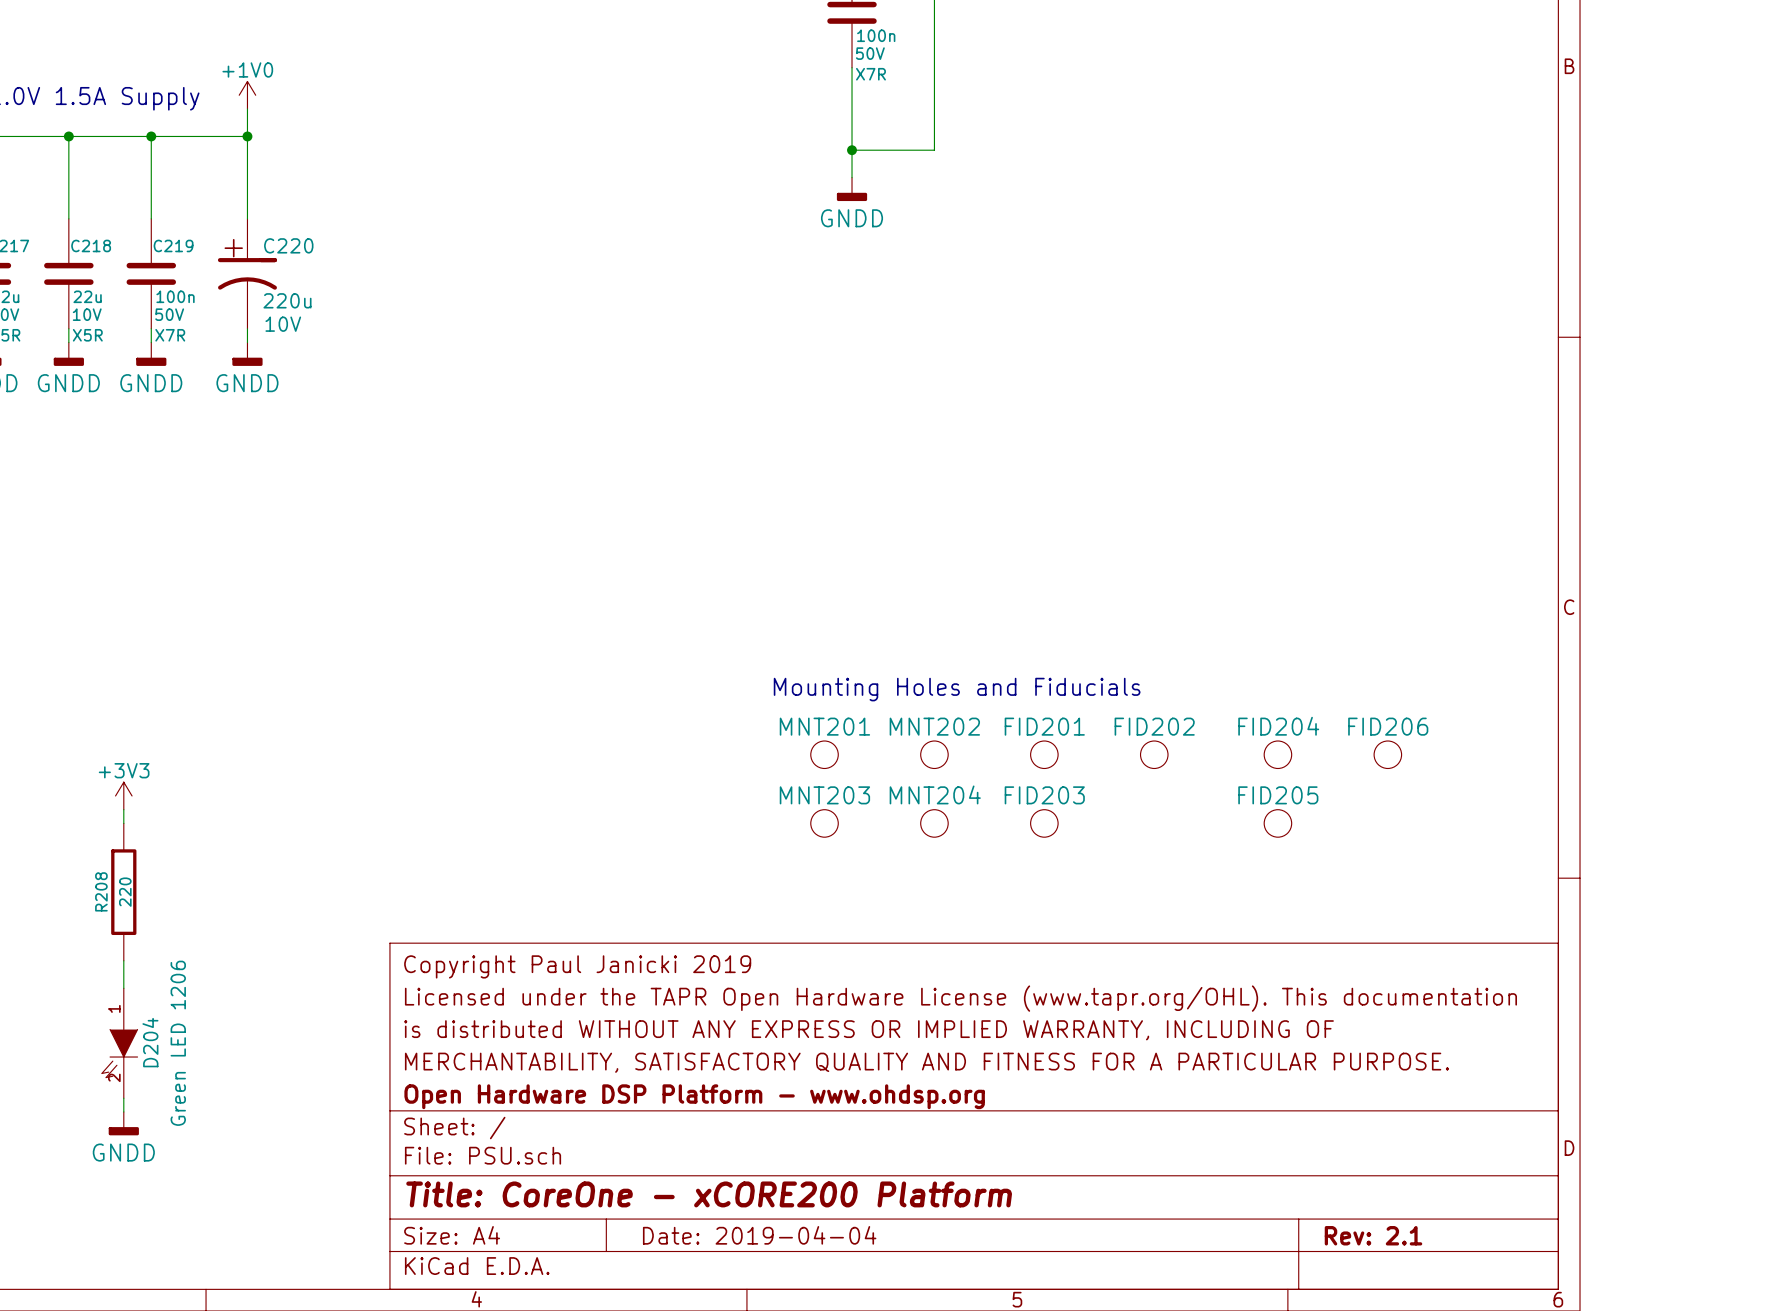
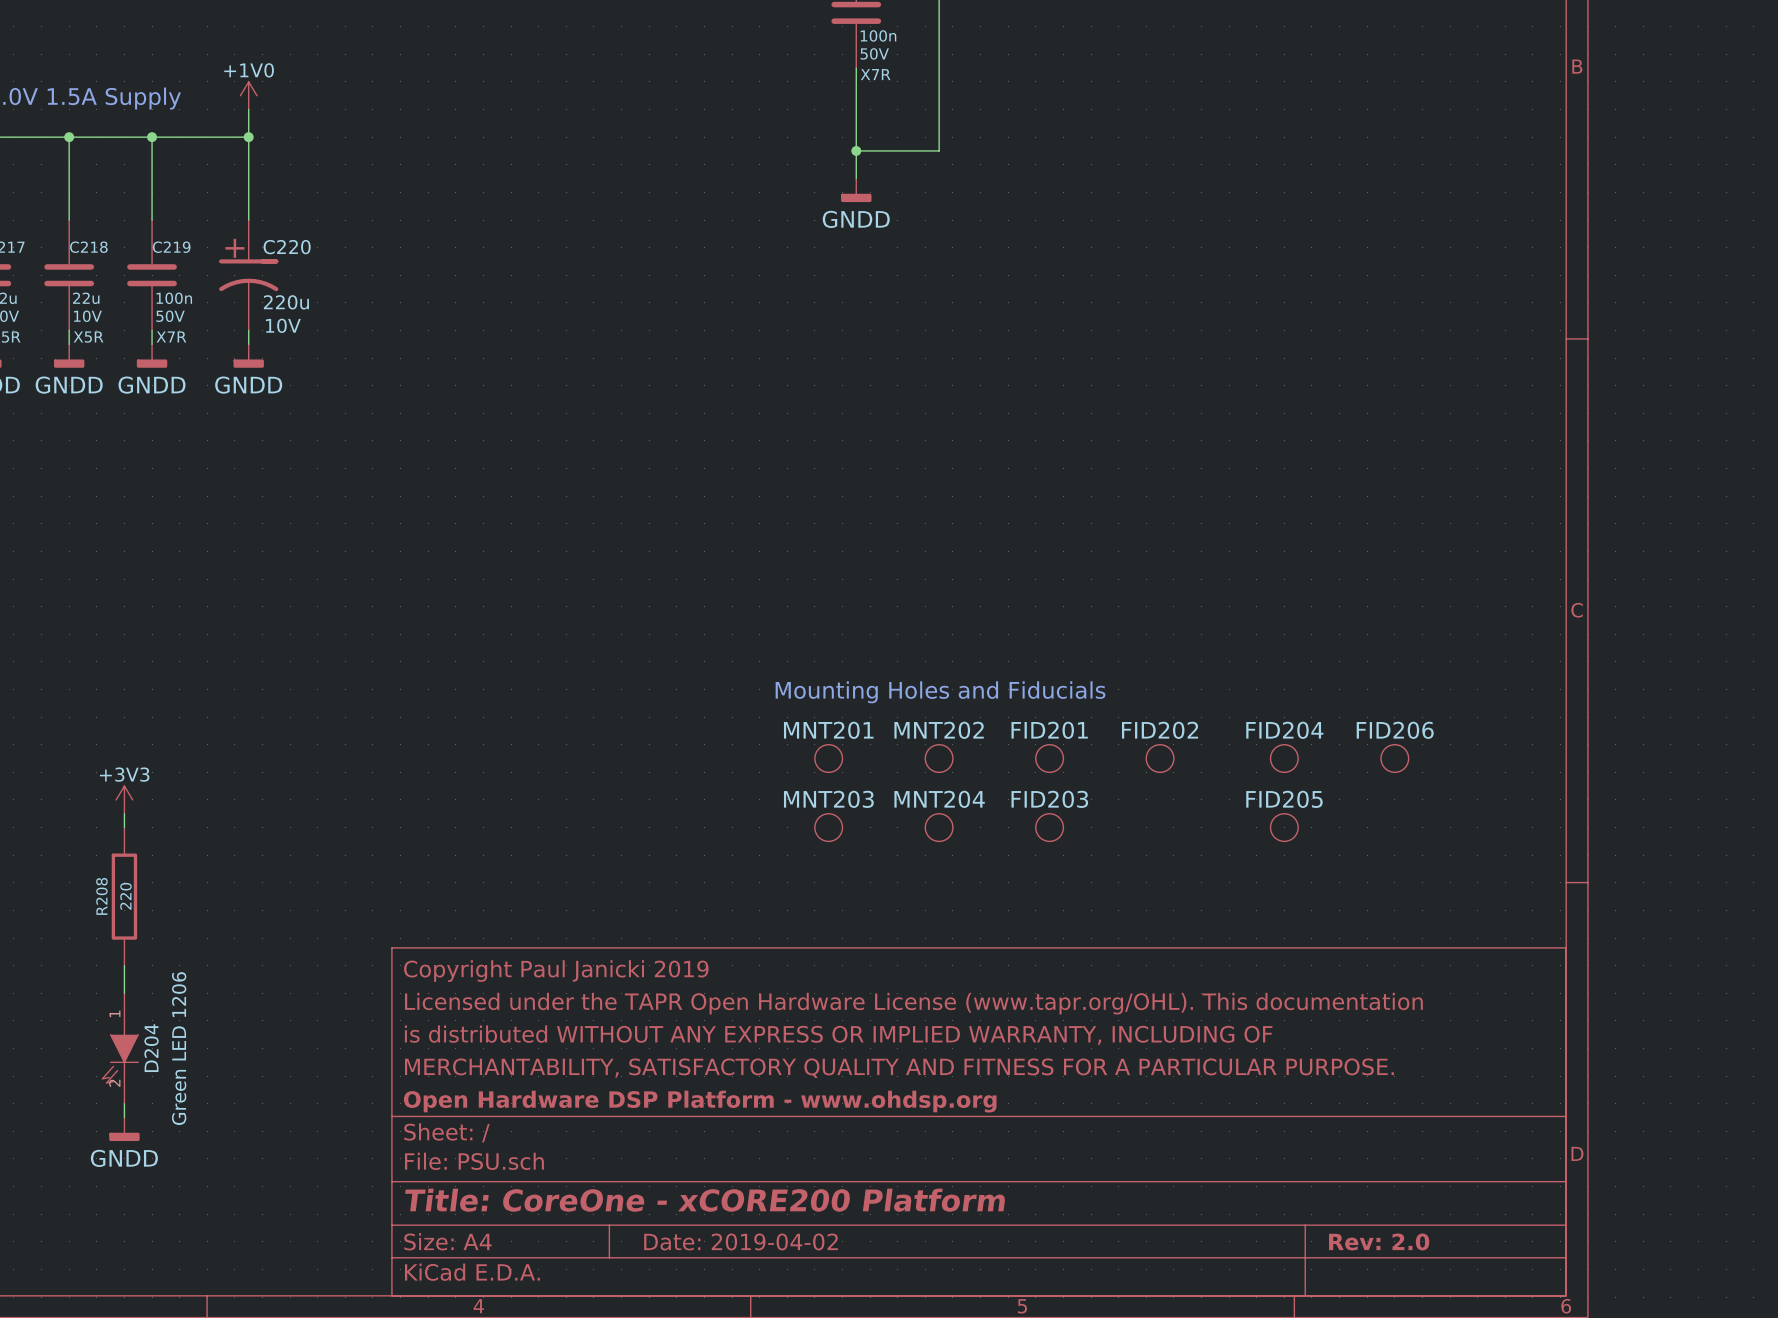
title block: Date: 2019-04-04 (759, 1235) -> Date: 2019-04-02 (741, 1241)
title block: Rev: 2.1 (1373, 1235) -> Rev: 2.0 (1379, 1241)

